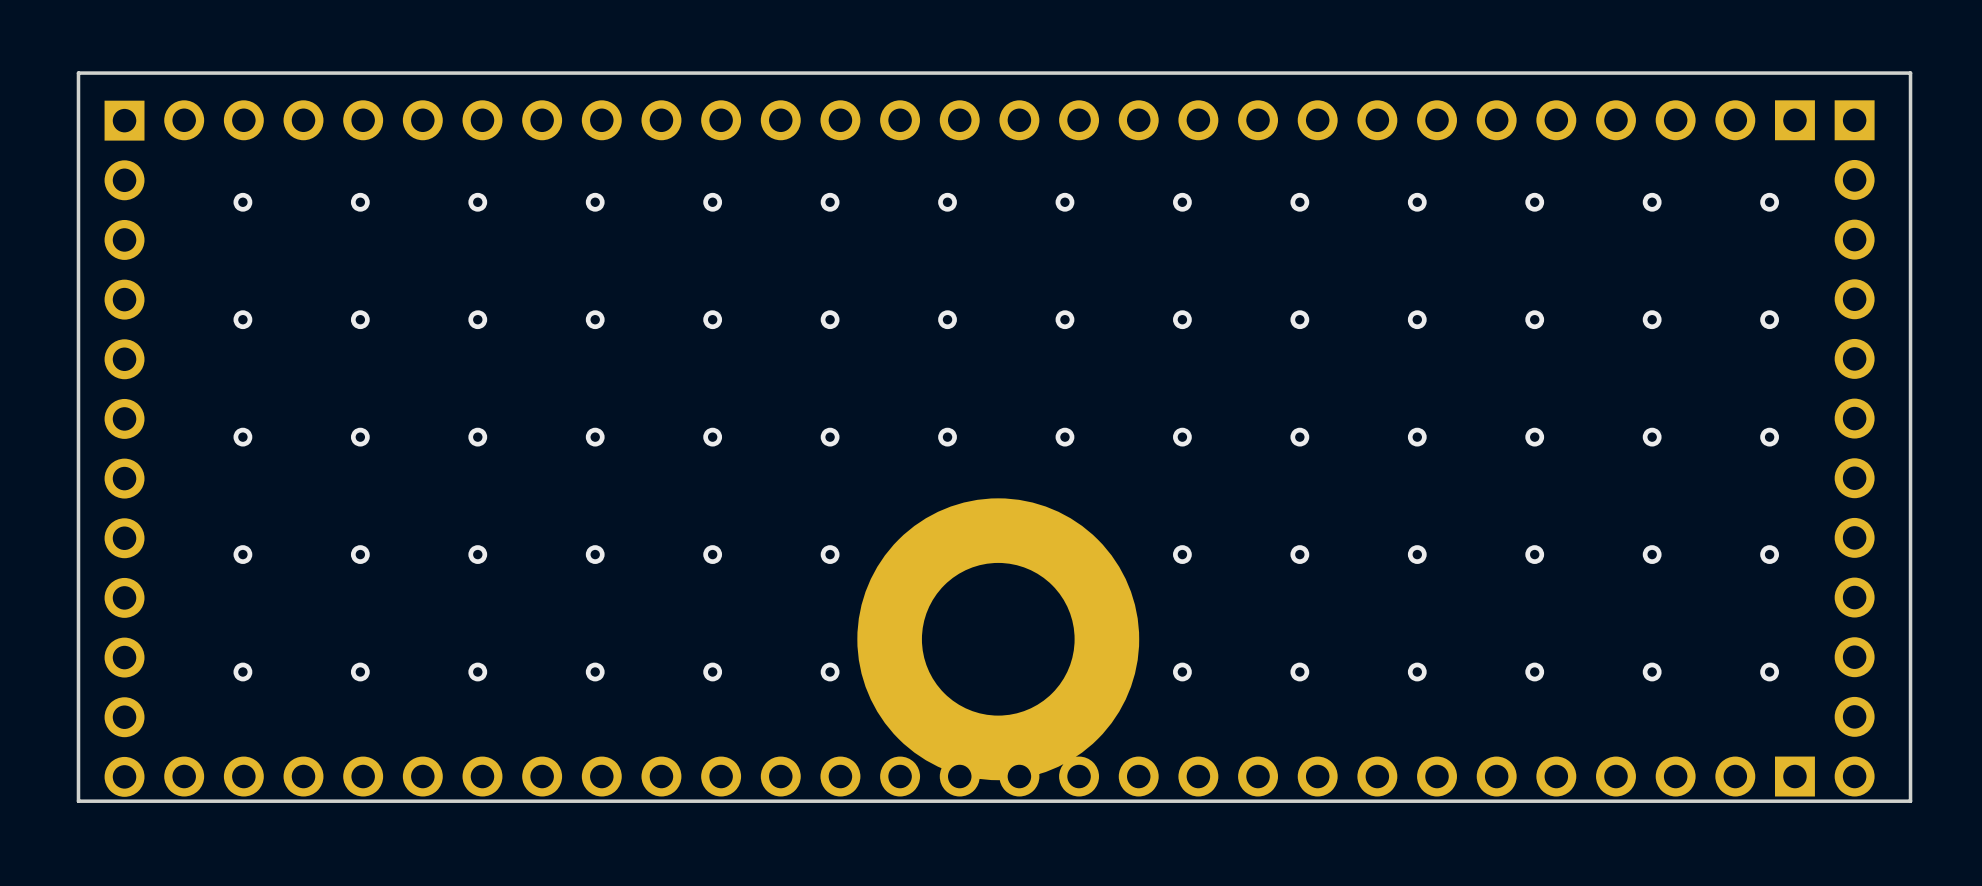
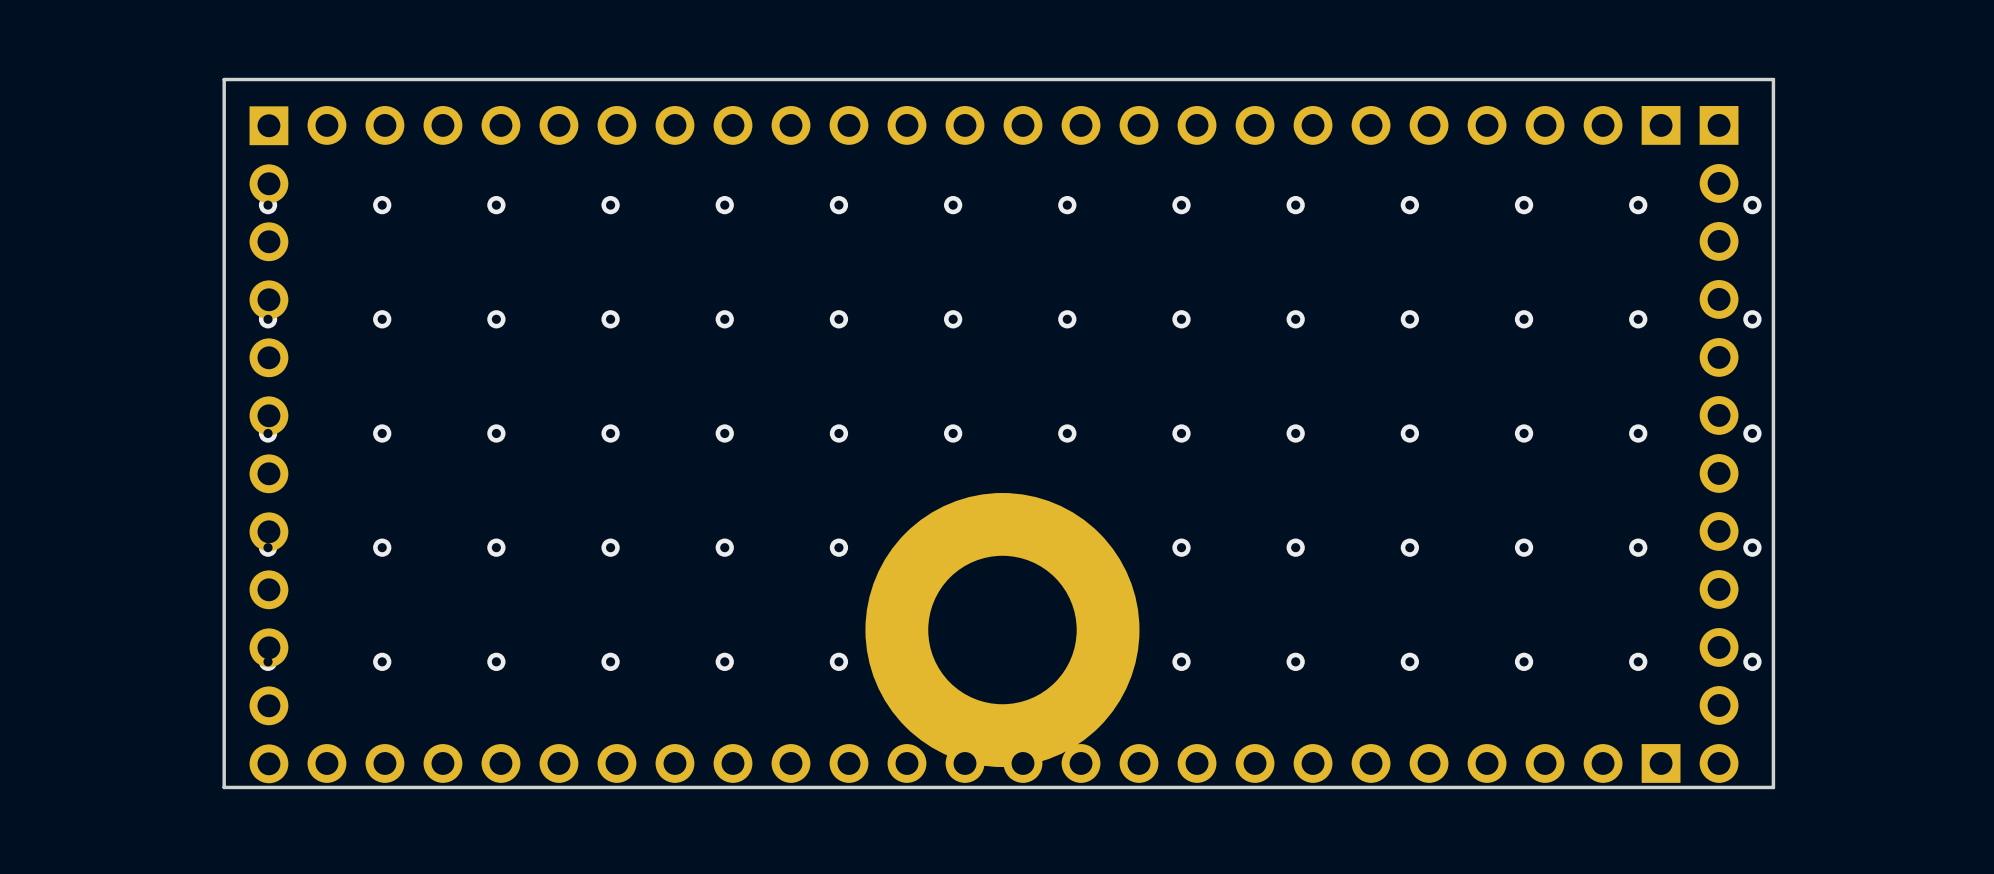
board edge: (197, 73) (78, 73) (78, 801) (197, 801) -> (224, 79) (224, 787)
board edge: (1791, 73) (1910, 73) (1910, 801) (1791, 801) -> (1773, 79) (1773, 787)
part footprint: [164, 100, 1815, 141] -> [307, 106, 1681, 145]
part position: (124, 448) -> (268, 444)
part position: (1854, 448) -> (1719, 444)
part footprint: [164, 756, 1815, 797] -> [307, 744, 1681, 783]

